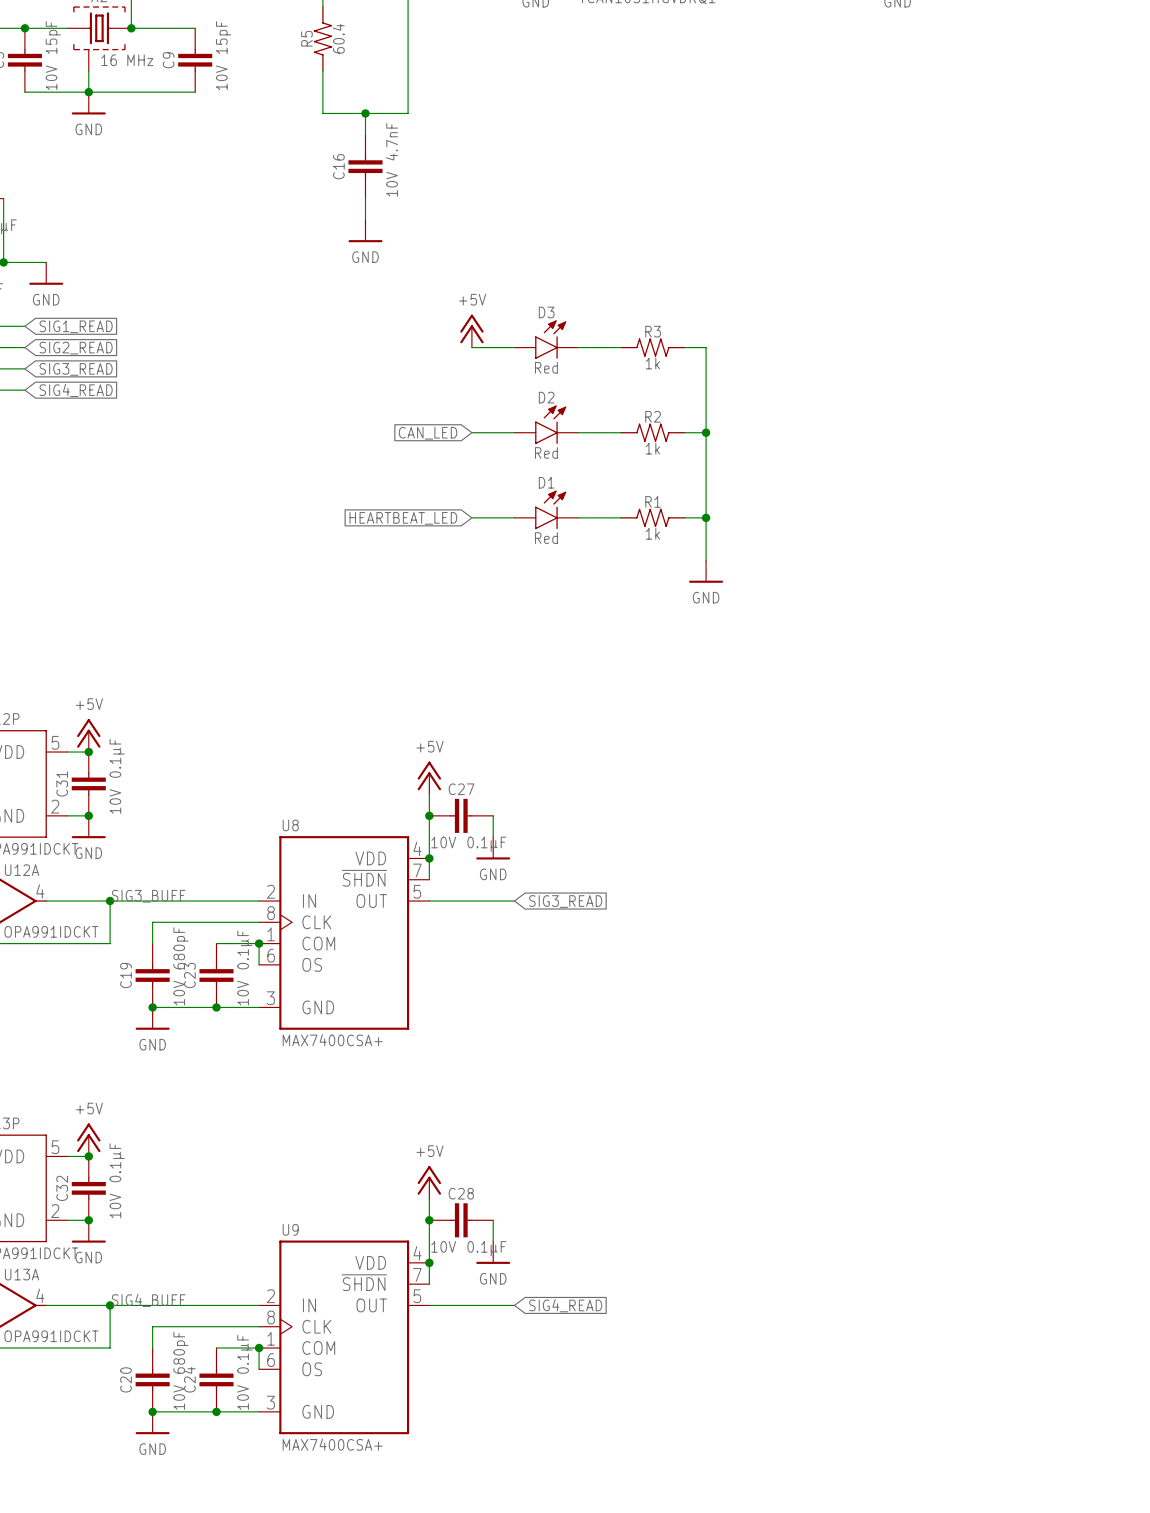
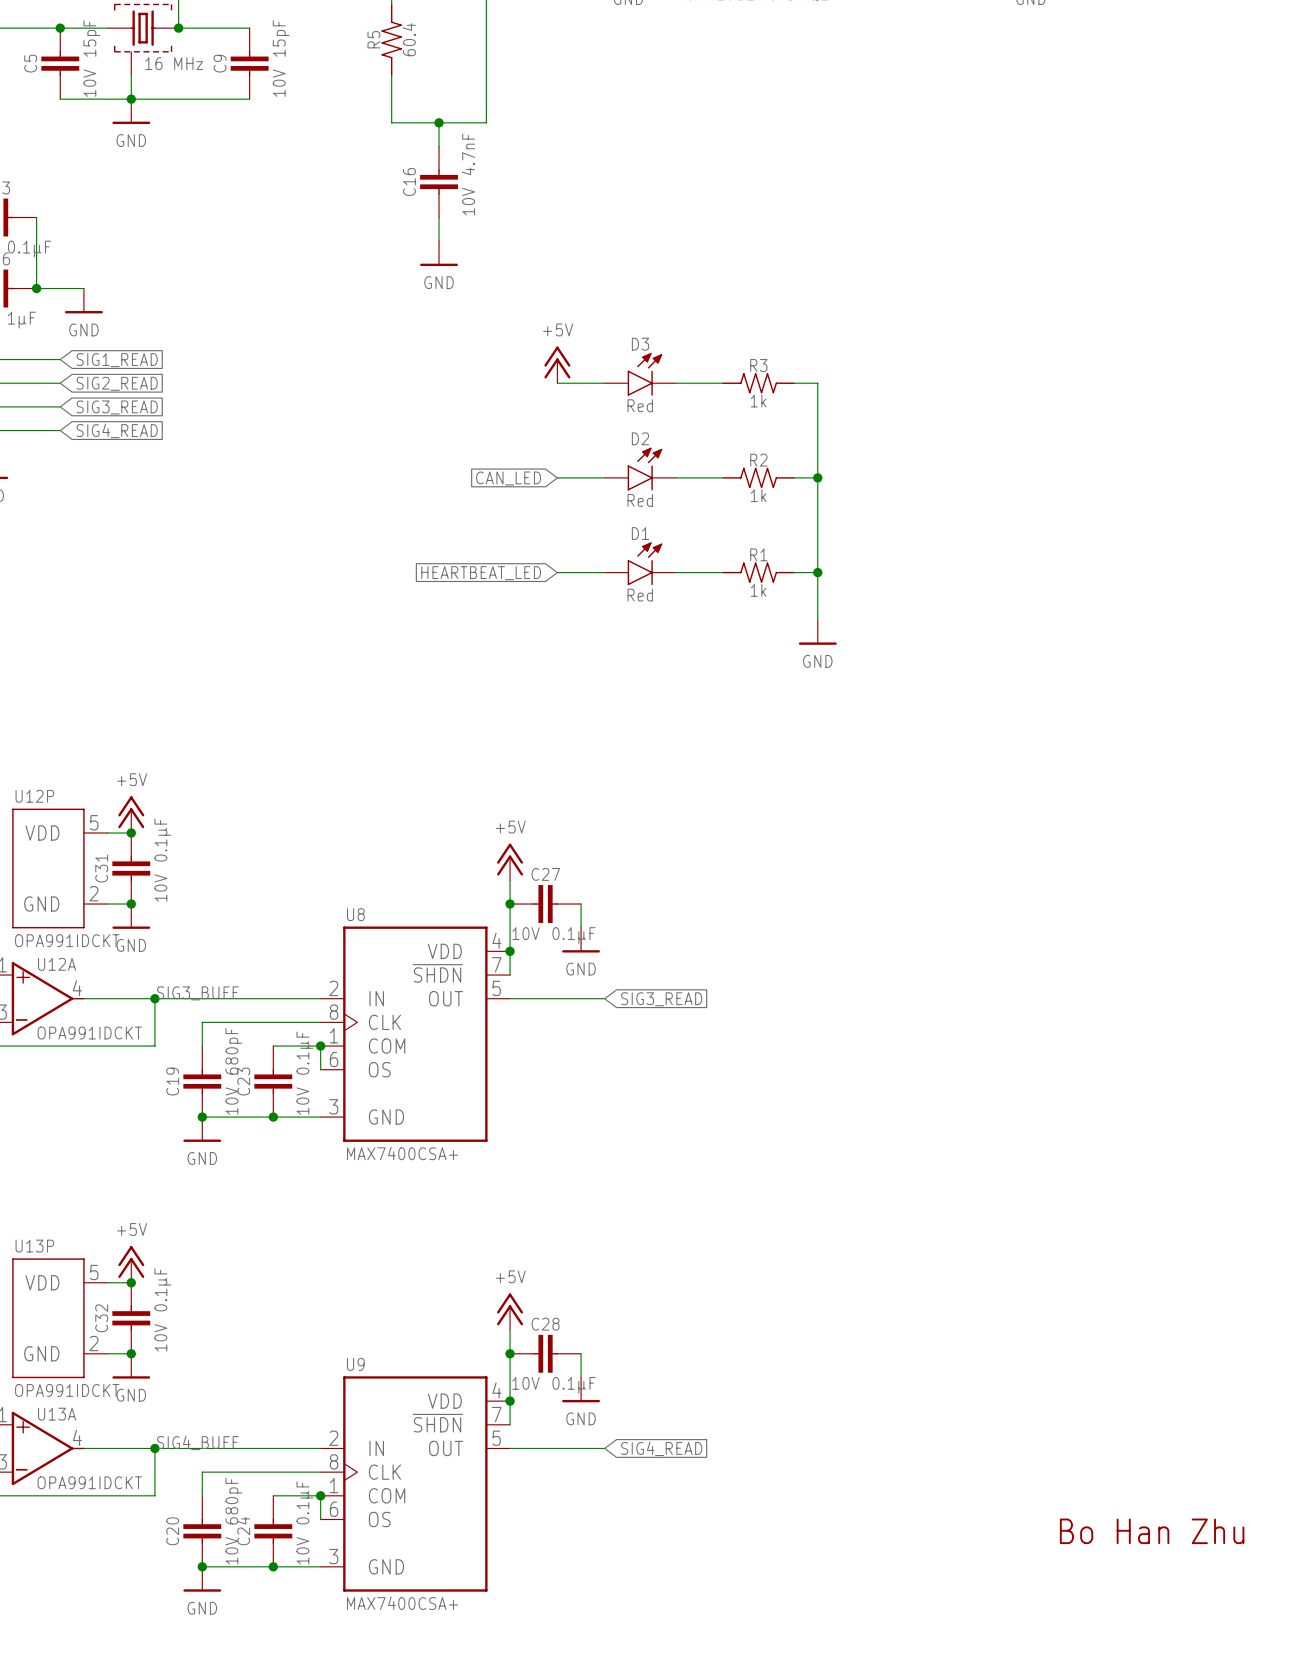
text: none -> Bo Han Zhu (1152, 1531)

